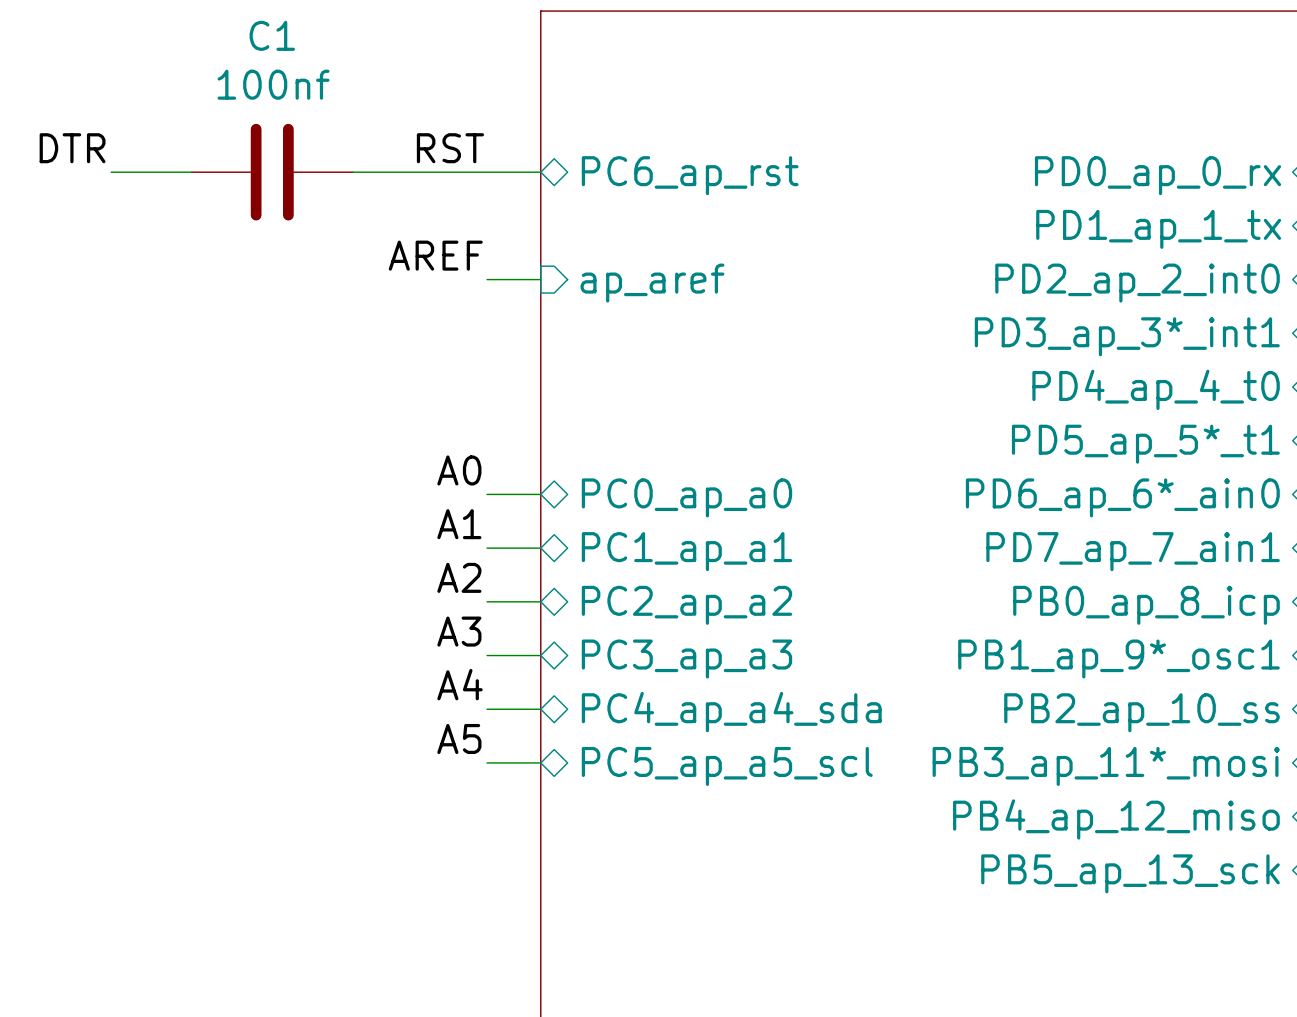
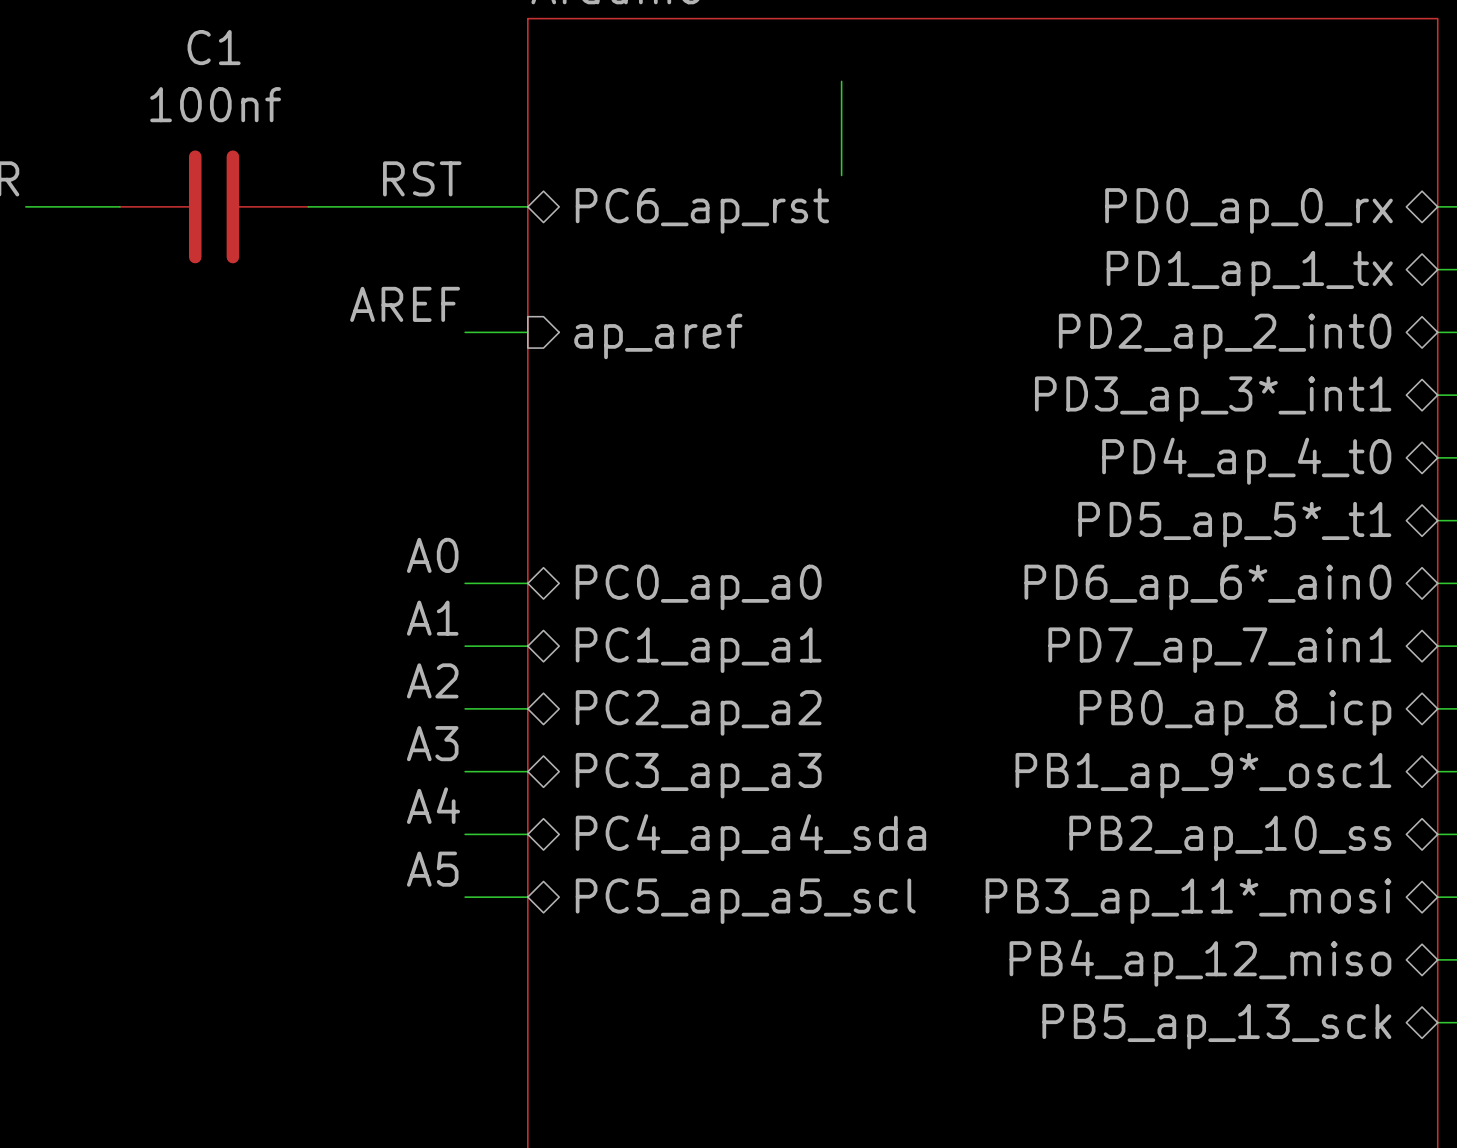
wire: none -> (841, 81) (841, 175)

